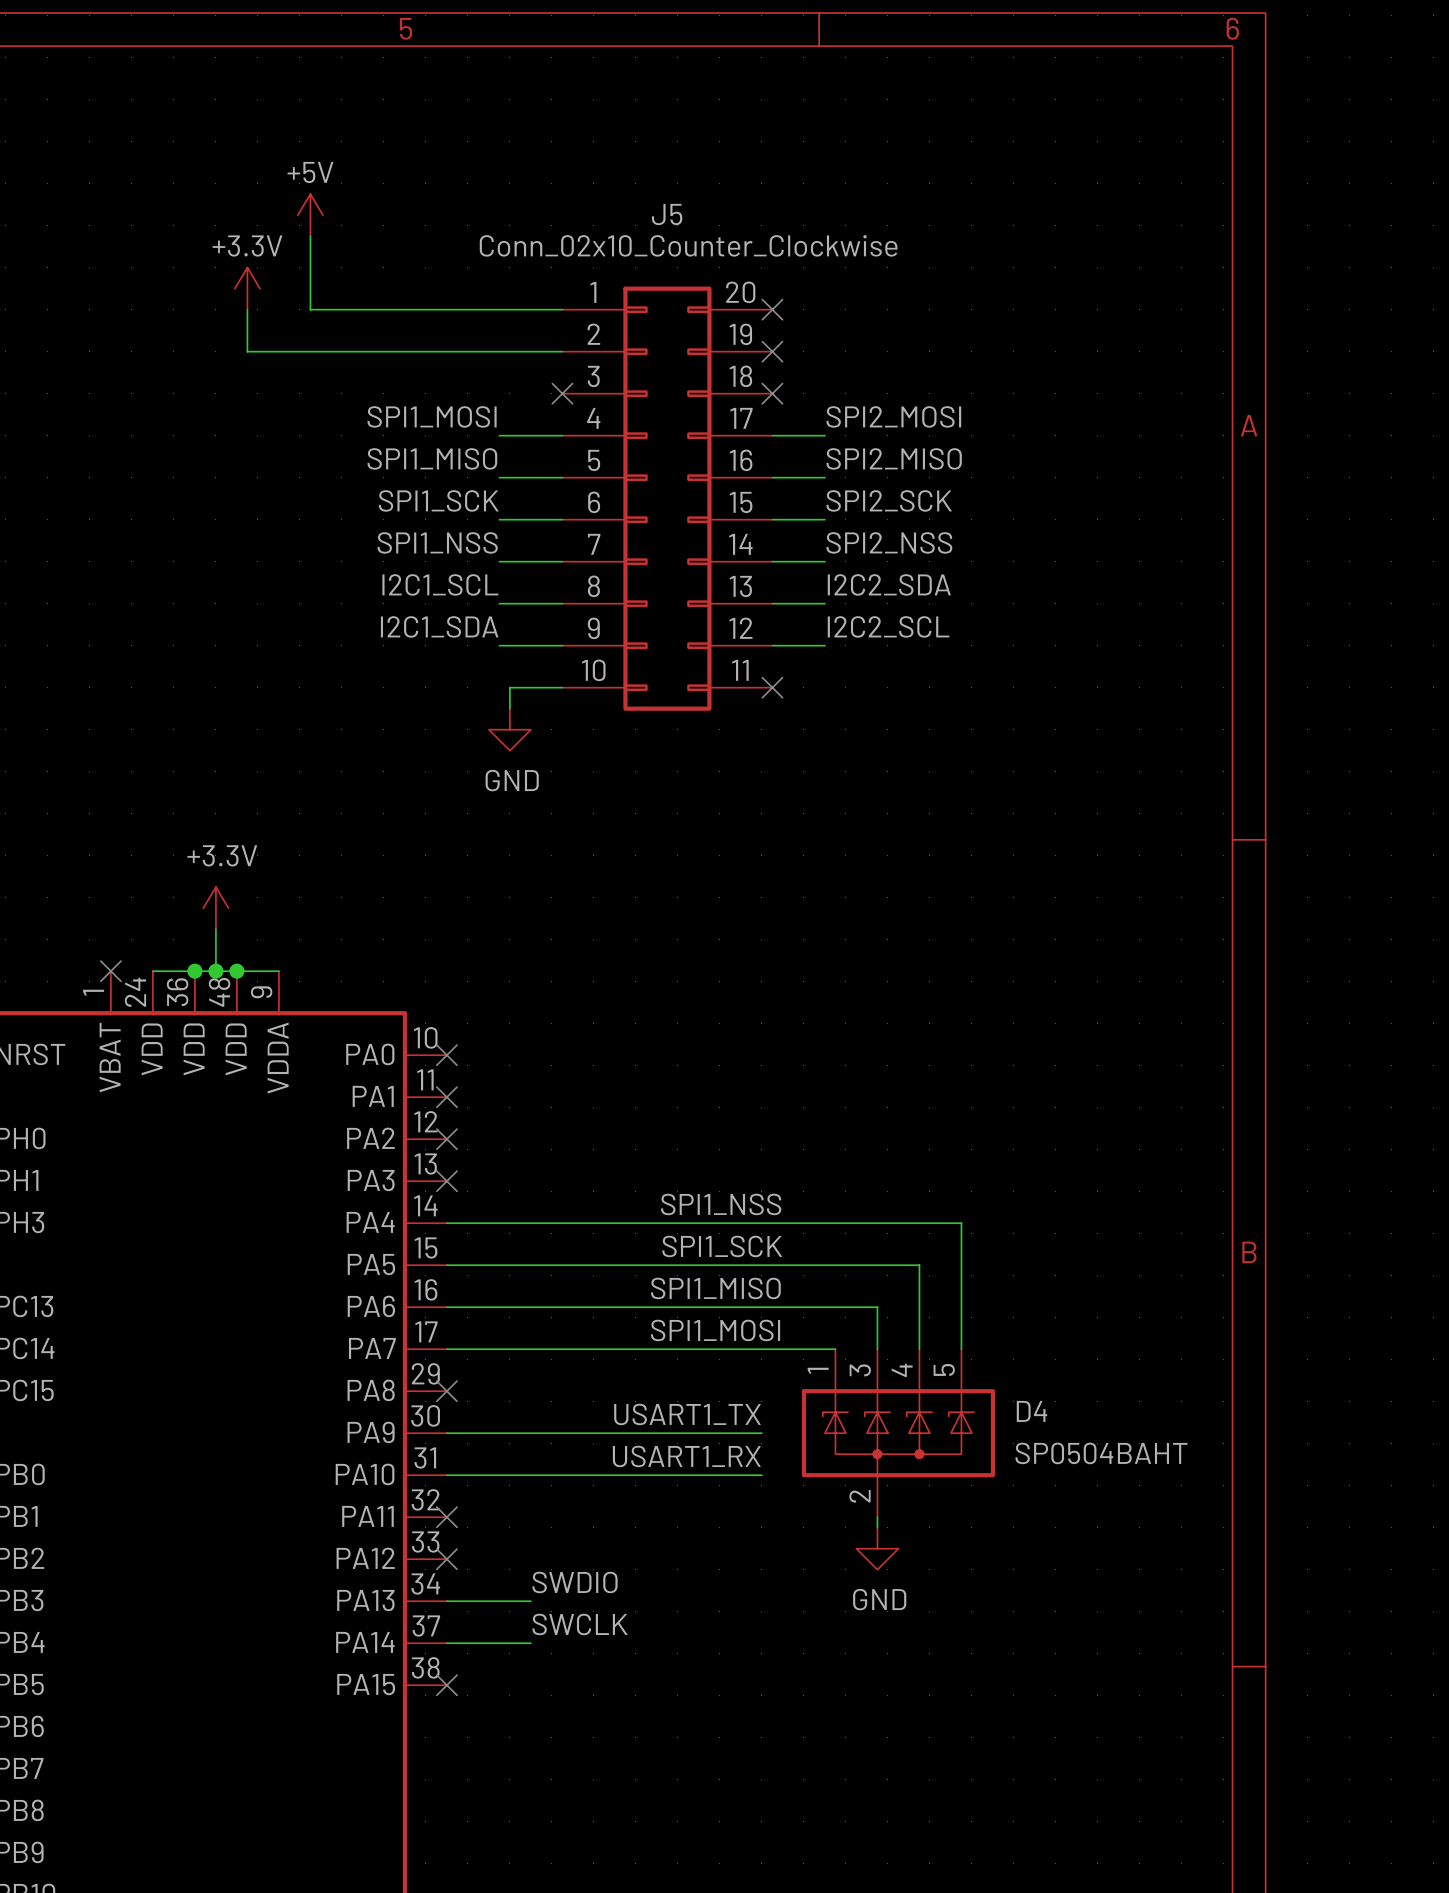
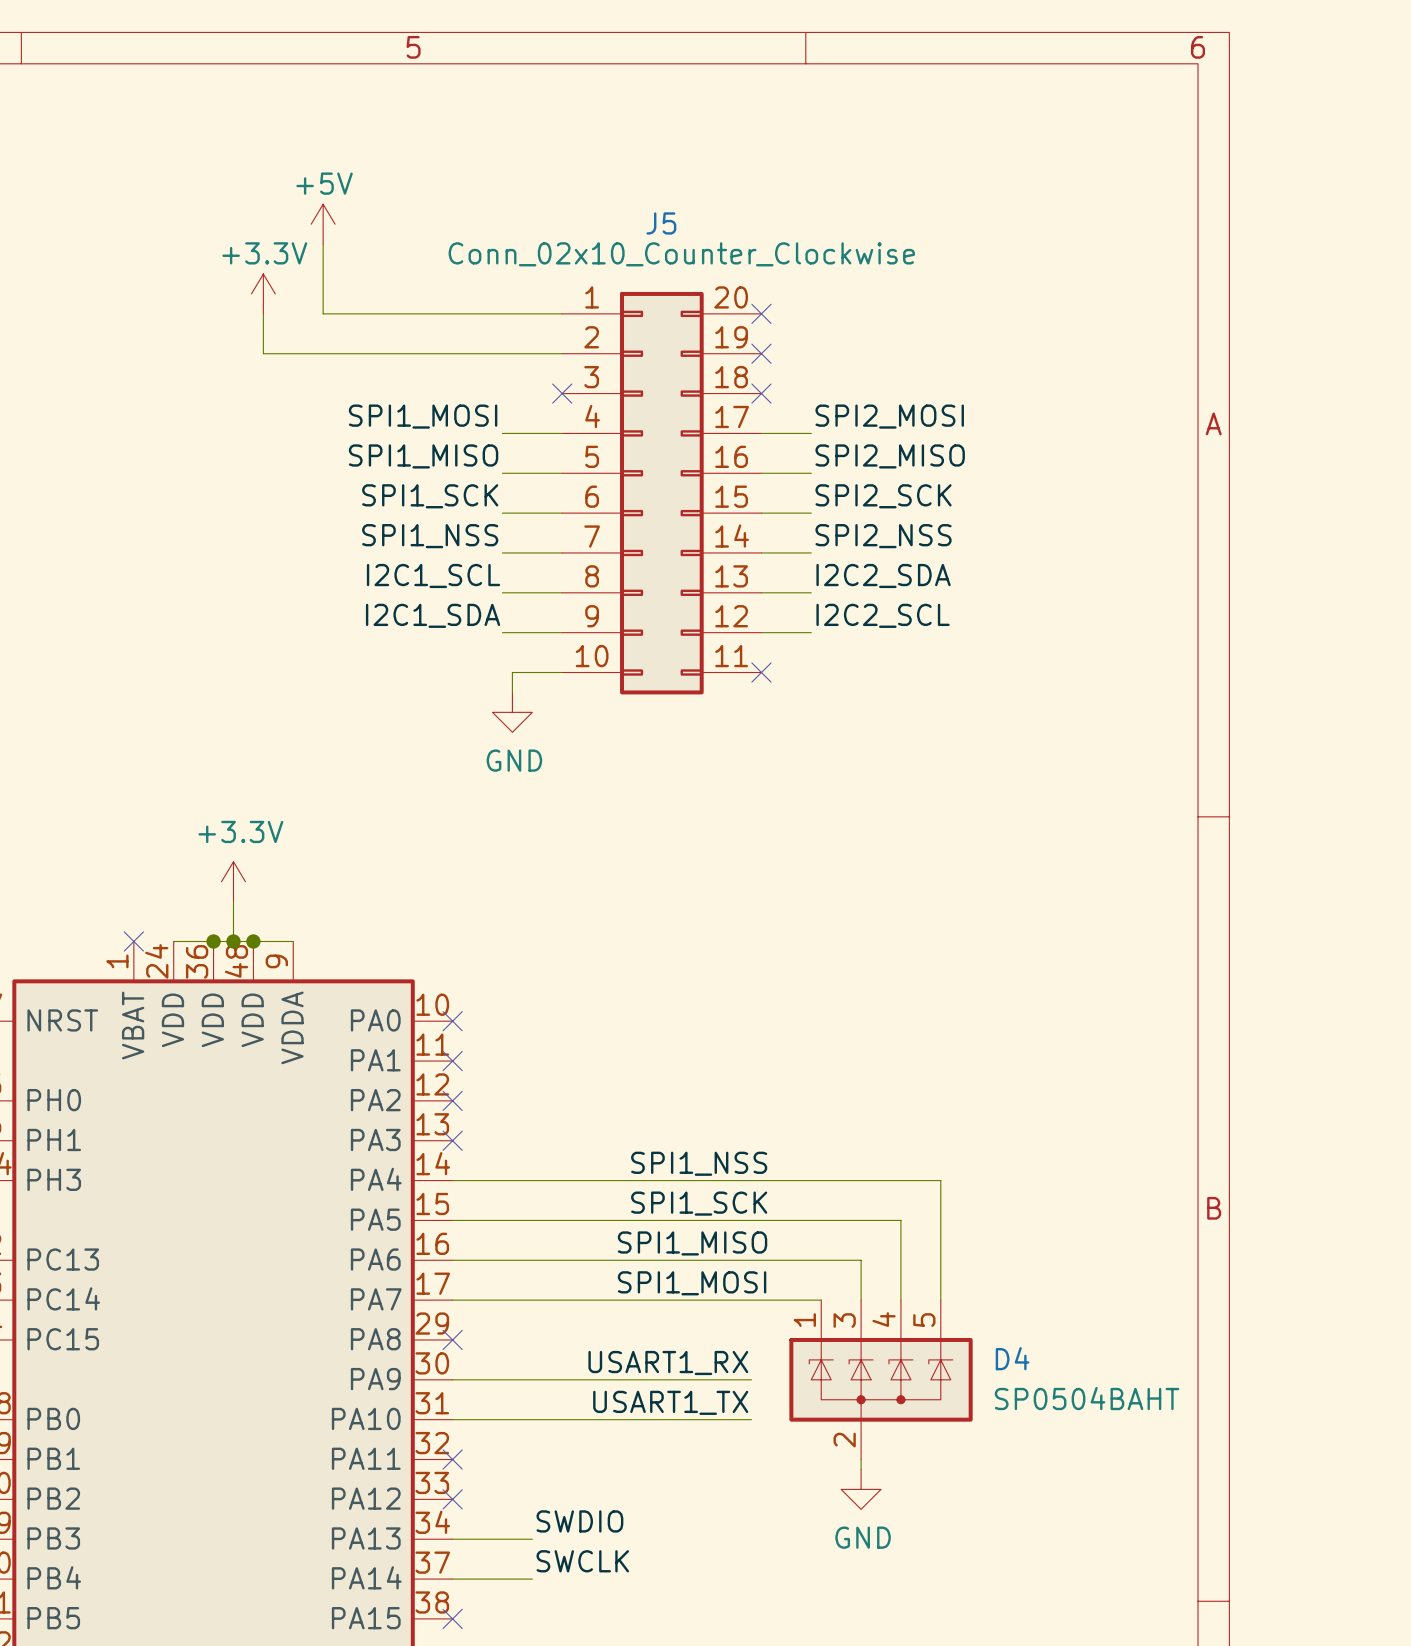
label: USART1_TX (687, 1414) -> USART1_RX (668, 1362)
label: USART1_RX (686, 1456) -> USART1_TX (670, 1402)

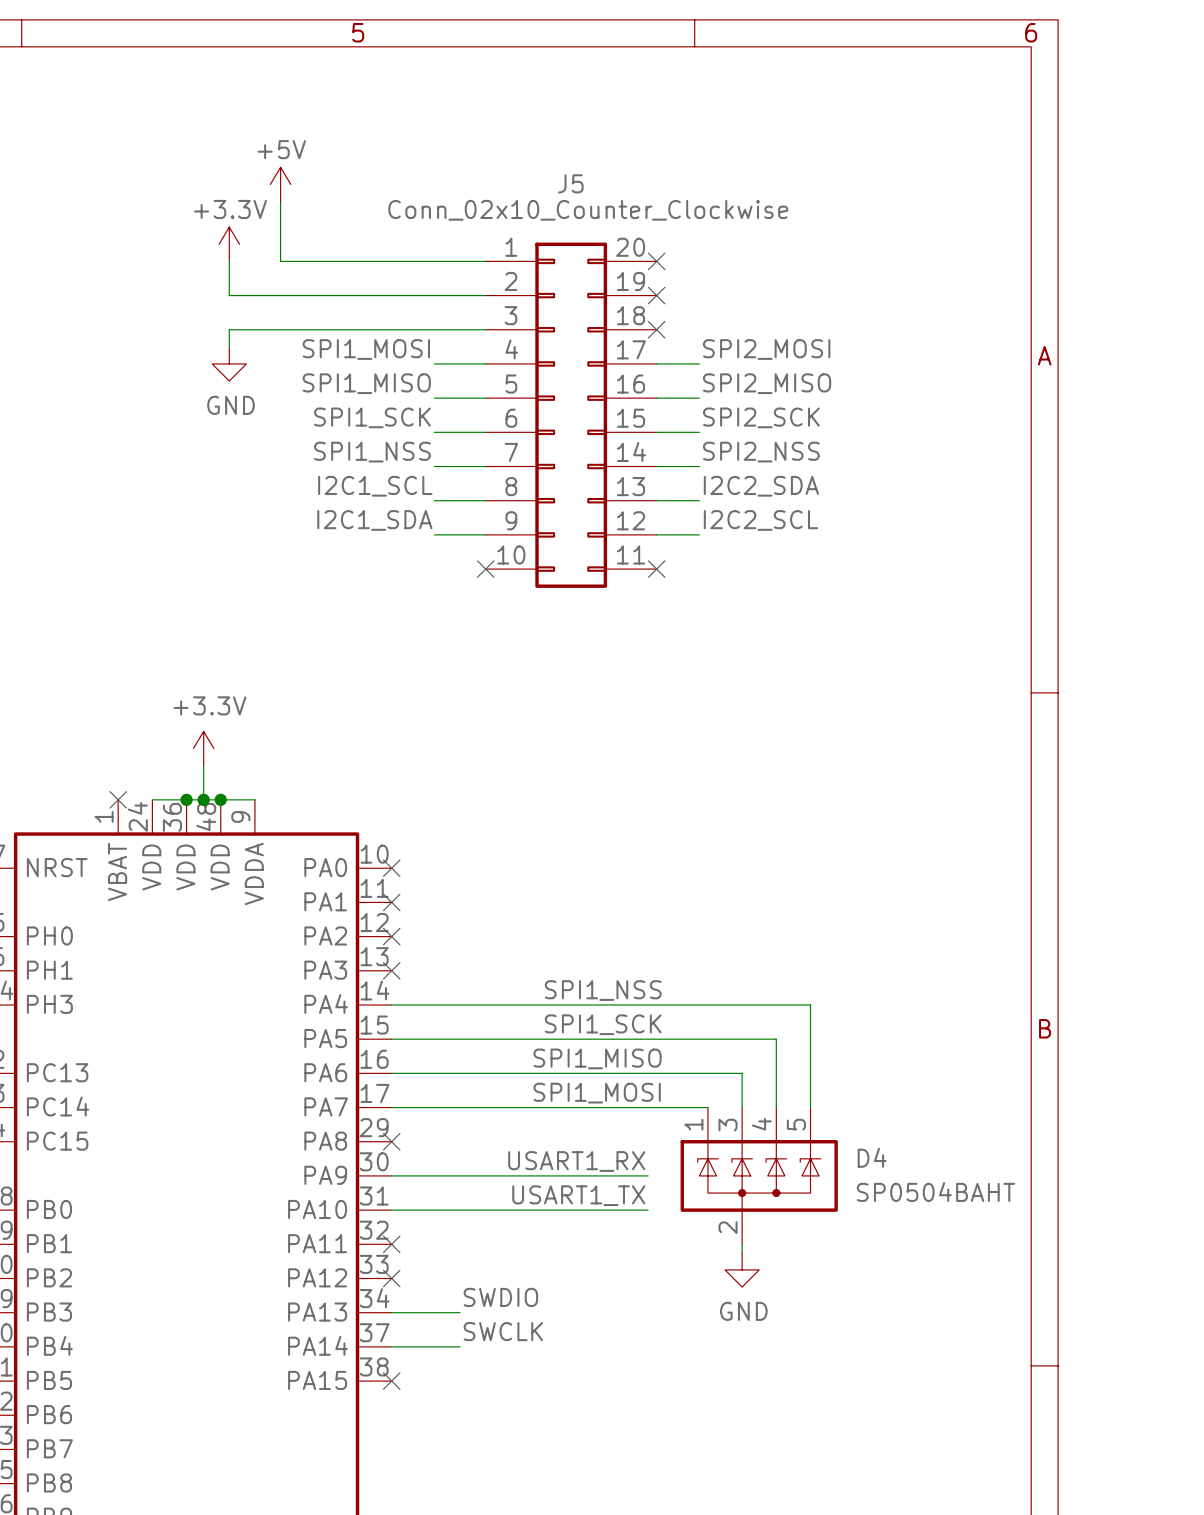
wire: none -> (485, 329) (229, 329) (229, 346)
no-connect mark: (562, 393) -> none
wire: (562, 672) (512, 672) (512, 692) -> none
no-connect mark: none -> (485, 569)
power symbol position: GND (512, 712) -> GND (229, 363)

